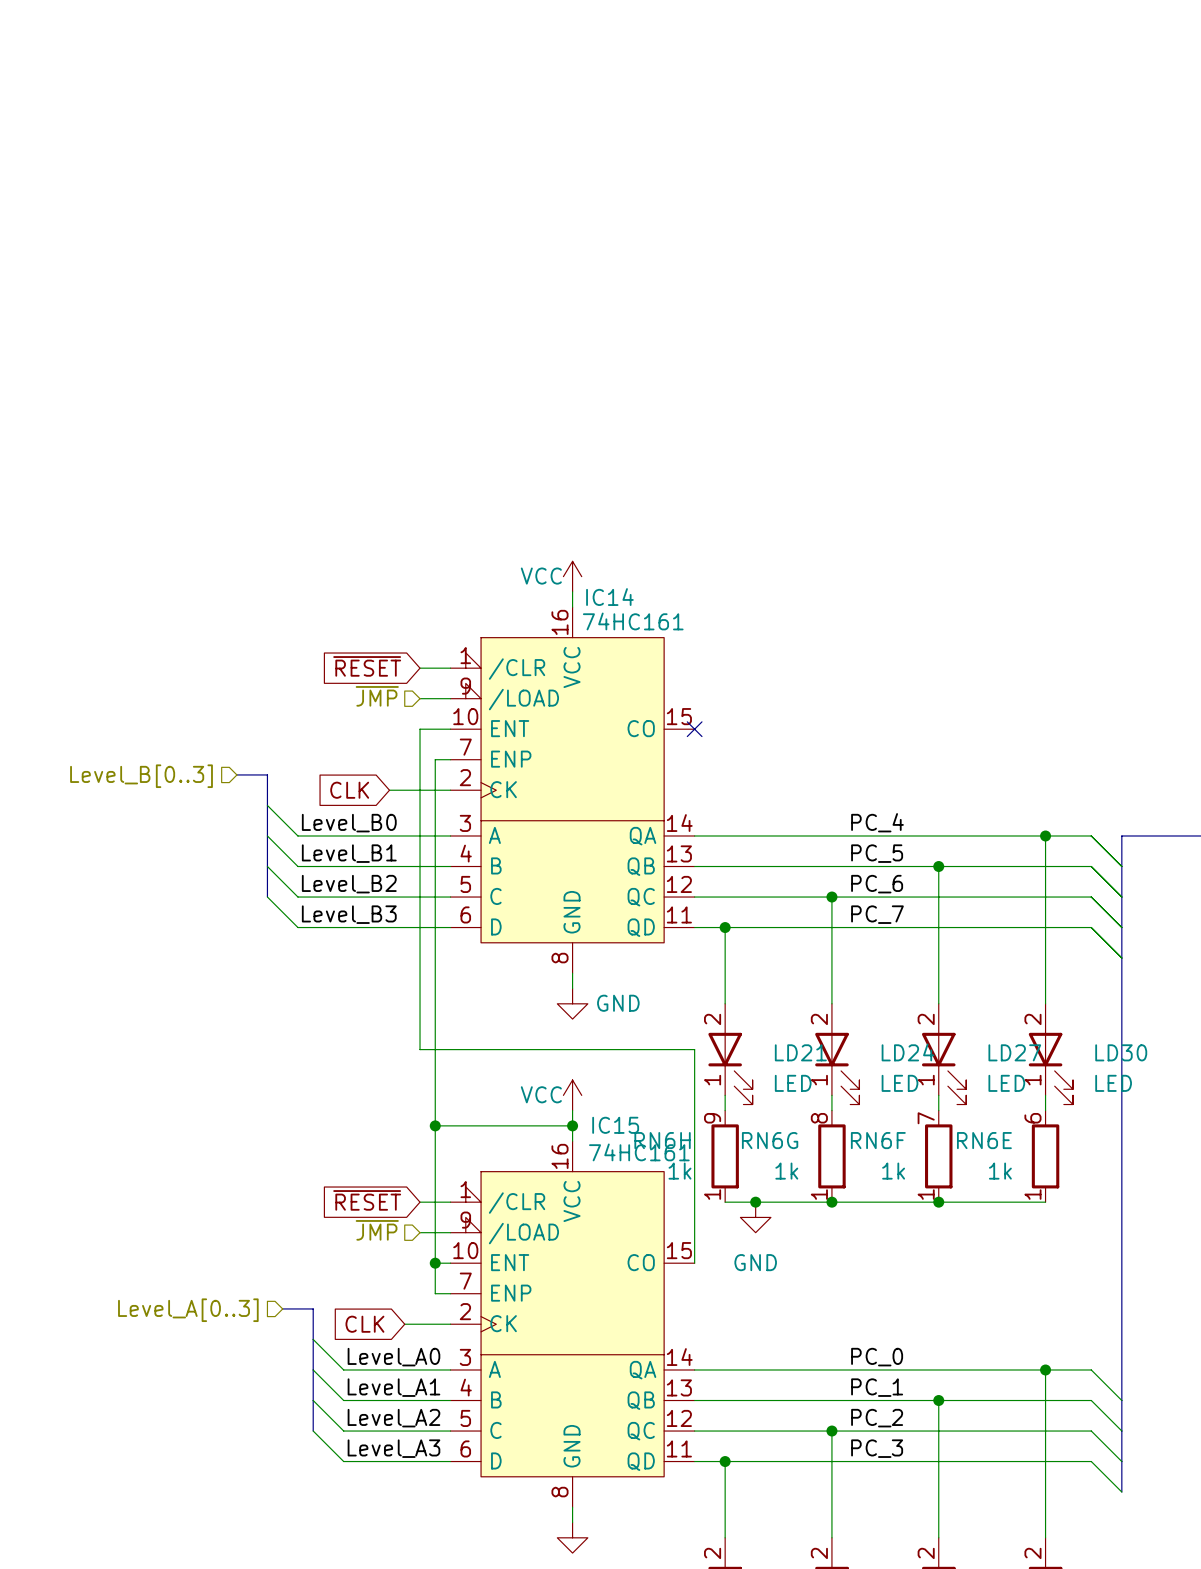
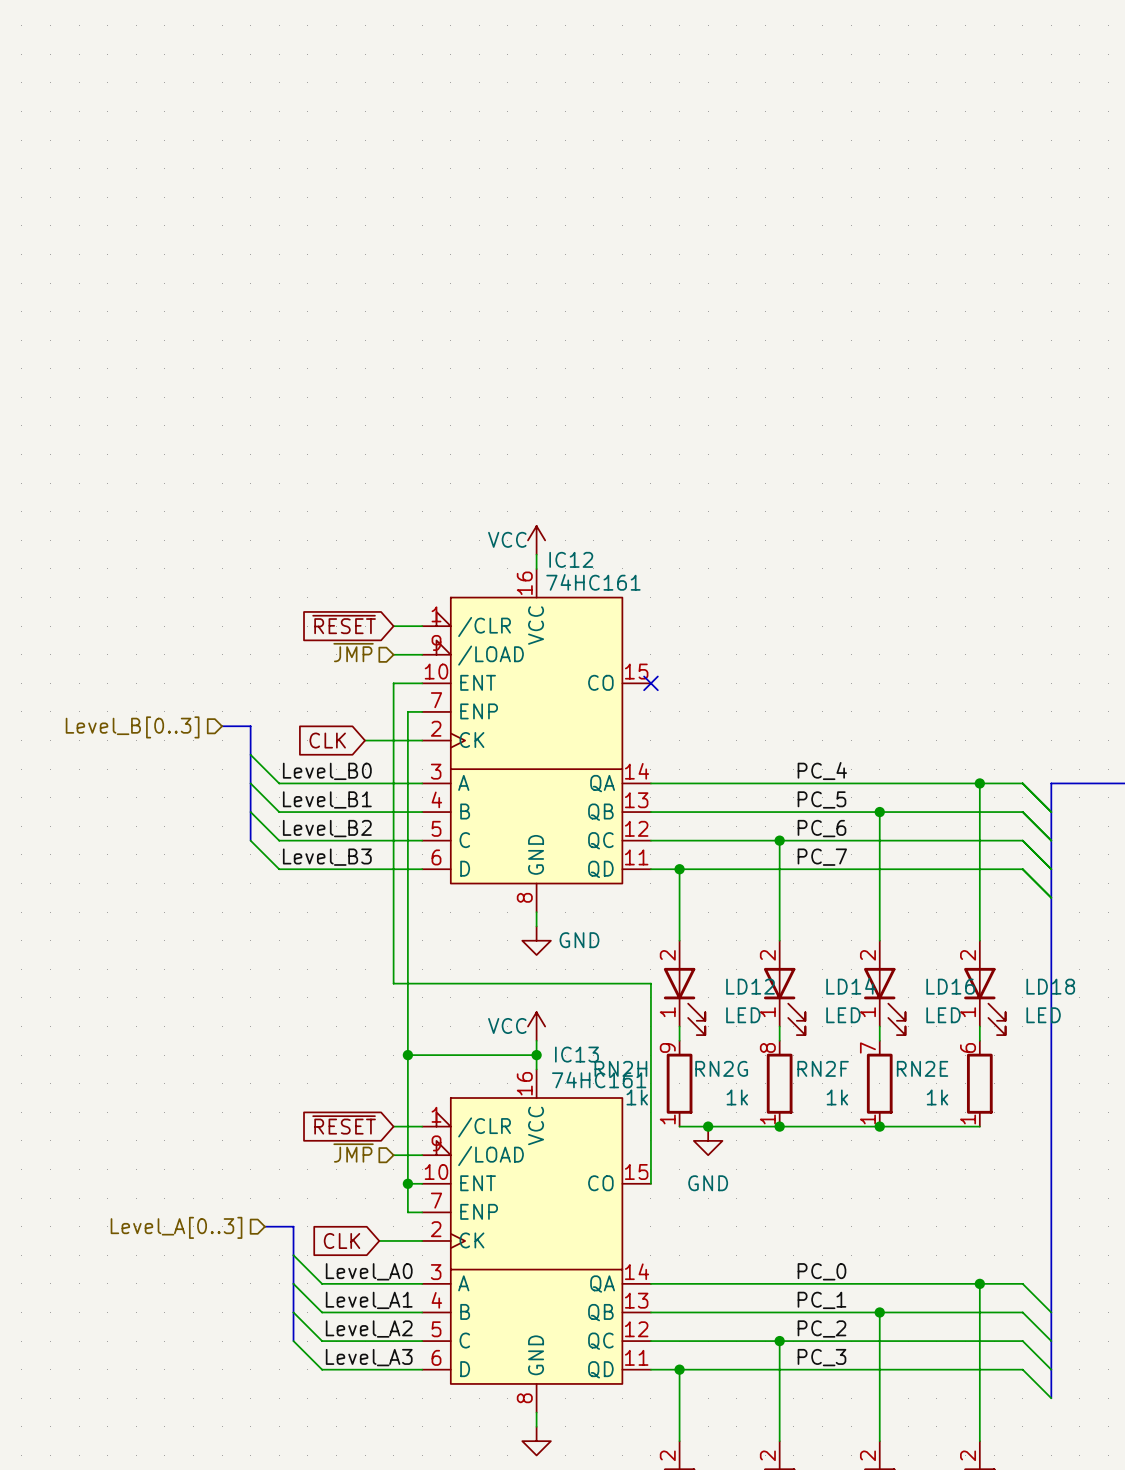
IC14 name: IC14 (609, 597) -> IC12 (571, 559)
LD21 name: LD21 (800, 1052) -> LD12 (750, 986)
LD24 name: LD24 (907, 1052) -> LD14 (850, 986)
LD27 name: LD27 (1014, 1052) -> LD16 (950, 986)
LD30 name: LD30 (1121, 1052) -> LD18 (1050, 986)
IC15 name: IC15 (615, 1125) -> IC13 (576, 1054)
RN6H name: RN6H (662, 1140) -> RN2H (620, 1068)
RN6G name: RN6G (770, 1140) -> RN2G (721, 1068)
RN6F name: RN6F (878, 1140) -> RN2F (823, 1068)
RN6E name: RN6E (984, 1140) -> RN2E (922, 1068)

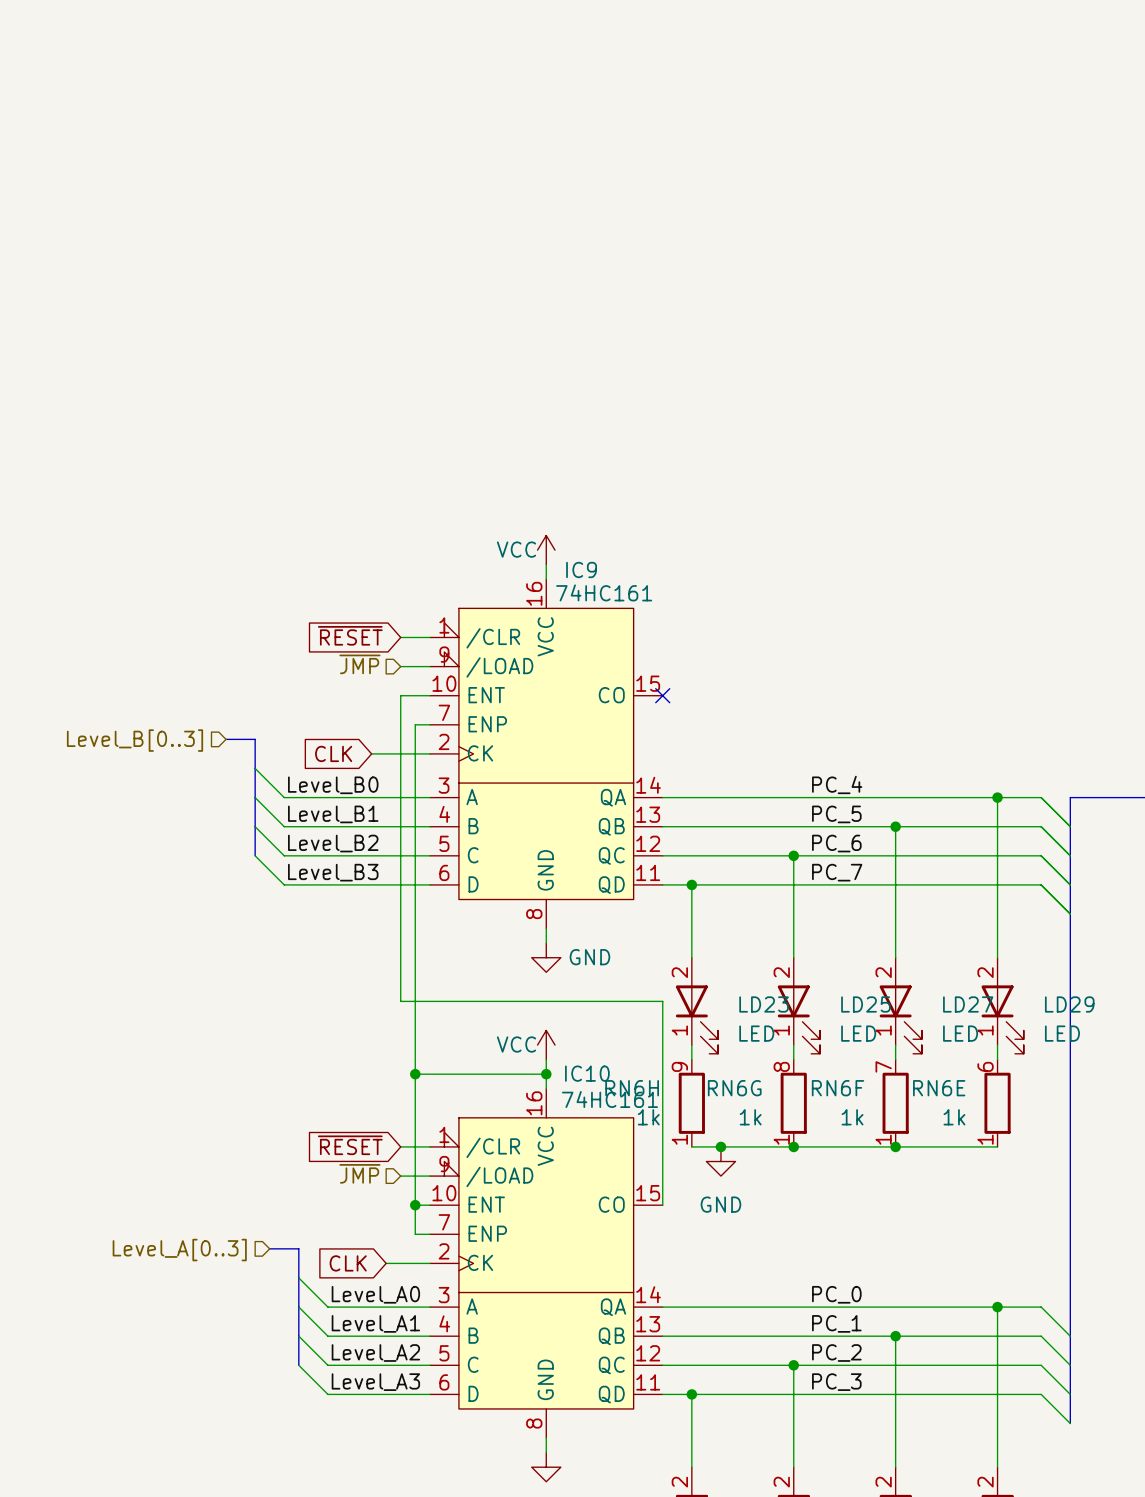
IC12 name: IC12 (571, 559) -> IC9 (581, 569)
LD12 name: LD12 (750, 986) -> LD23 (764, 1004)
LD14 name: LD14 (850, 986) -> LD25 (865, 1004)
LD16 name: LD16 (950, 986) -> LD27 (968, 1004)
LD18 name: LD18 (1050, 986) -> LD29 (1069, 1004)
IC13 name: IC13 (576, 1054) -> IC10 (587, 1073)
RN2H name: RN2H (620, 1068) -> RN6H (632, 1088)
RN2G name: RN2G (721, 1068) -> RN6G (734, 1088)
RN2F name: RN2F (823, 1068) -> RN6F (838, 1088)
RN2E name: RN2E (922, 1068) -> RN6E (939, 1088)

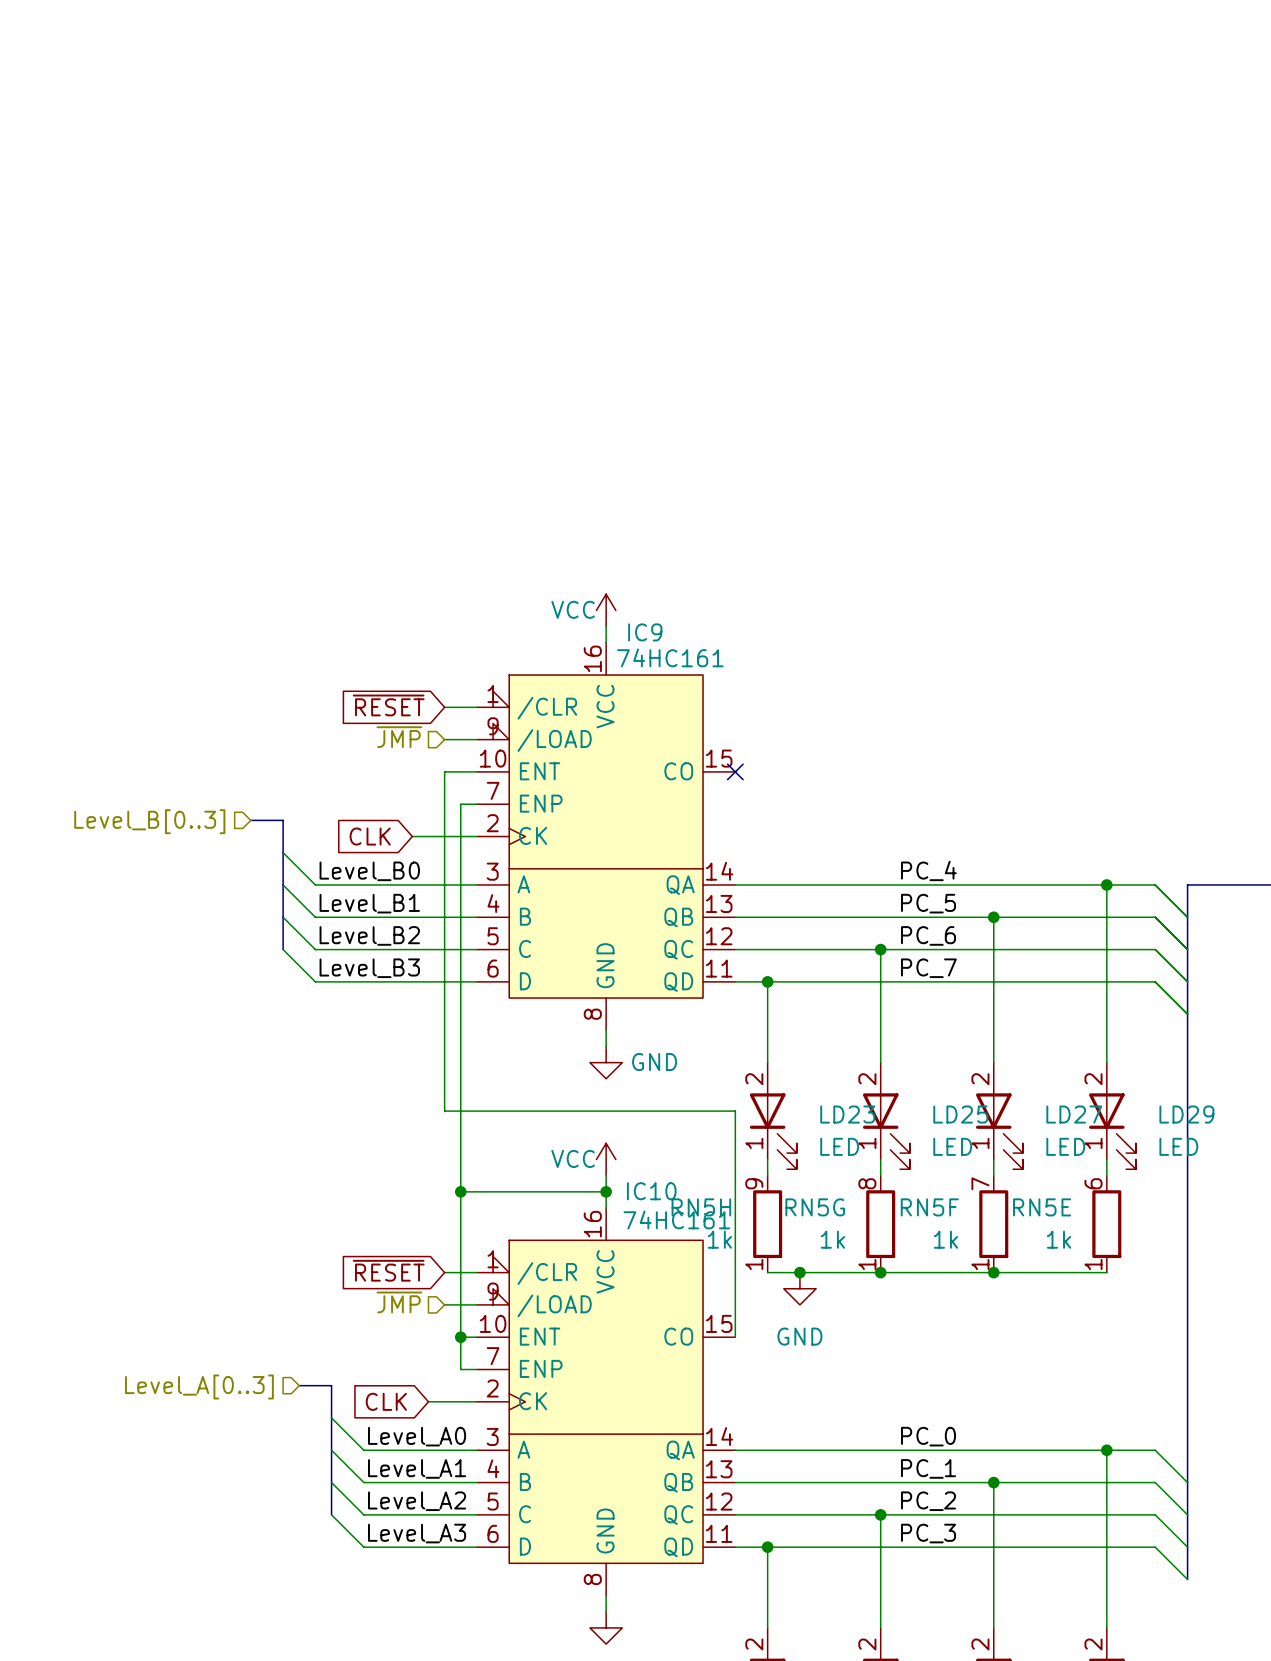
RN6H name: RN6H (632, 1088) -> RN5H (701, 1207)
RN6G name: RN6G (734, 1088) -> RN5G (815, 1207)
RN6F name: RN6F (838, 1088) -> RN5F (929, 1207)
RN6E name: RN6E (939, 1088) -> RN5E (1042, 1207)

